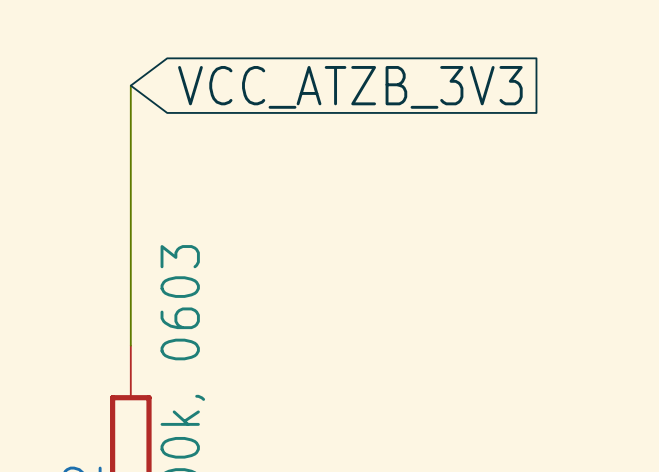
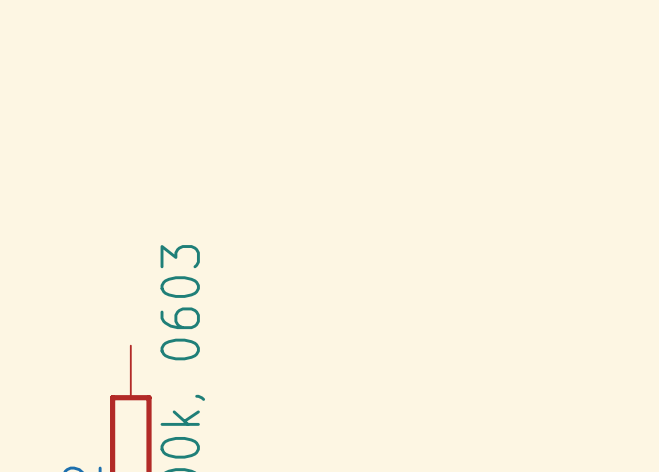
wire: (130, 85) (130, 345) -> none
global label: VCC_ATZB_3V3 (350, 87) -> none

